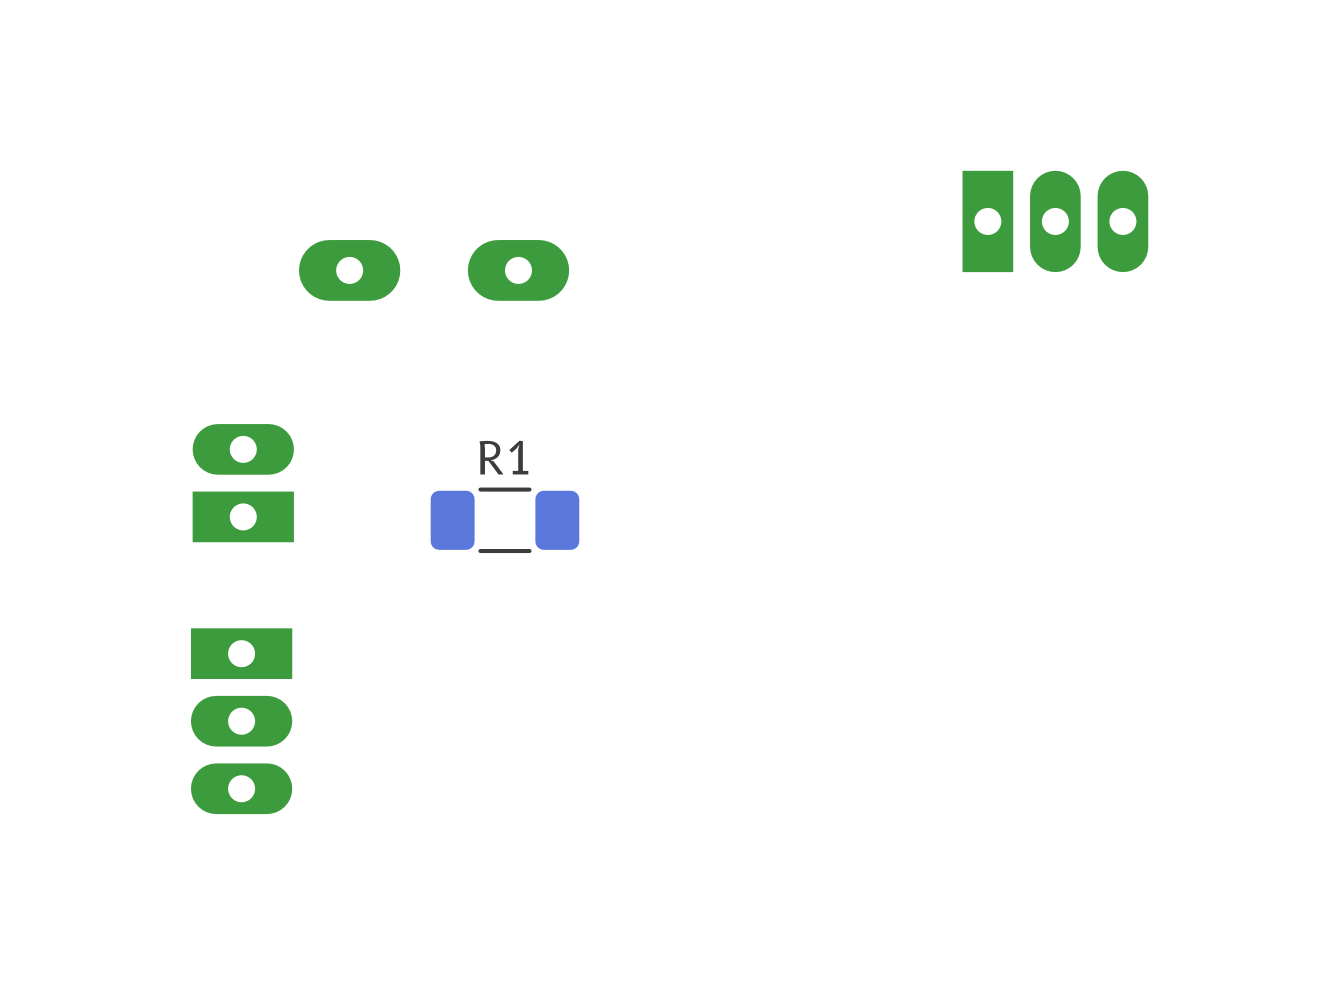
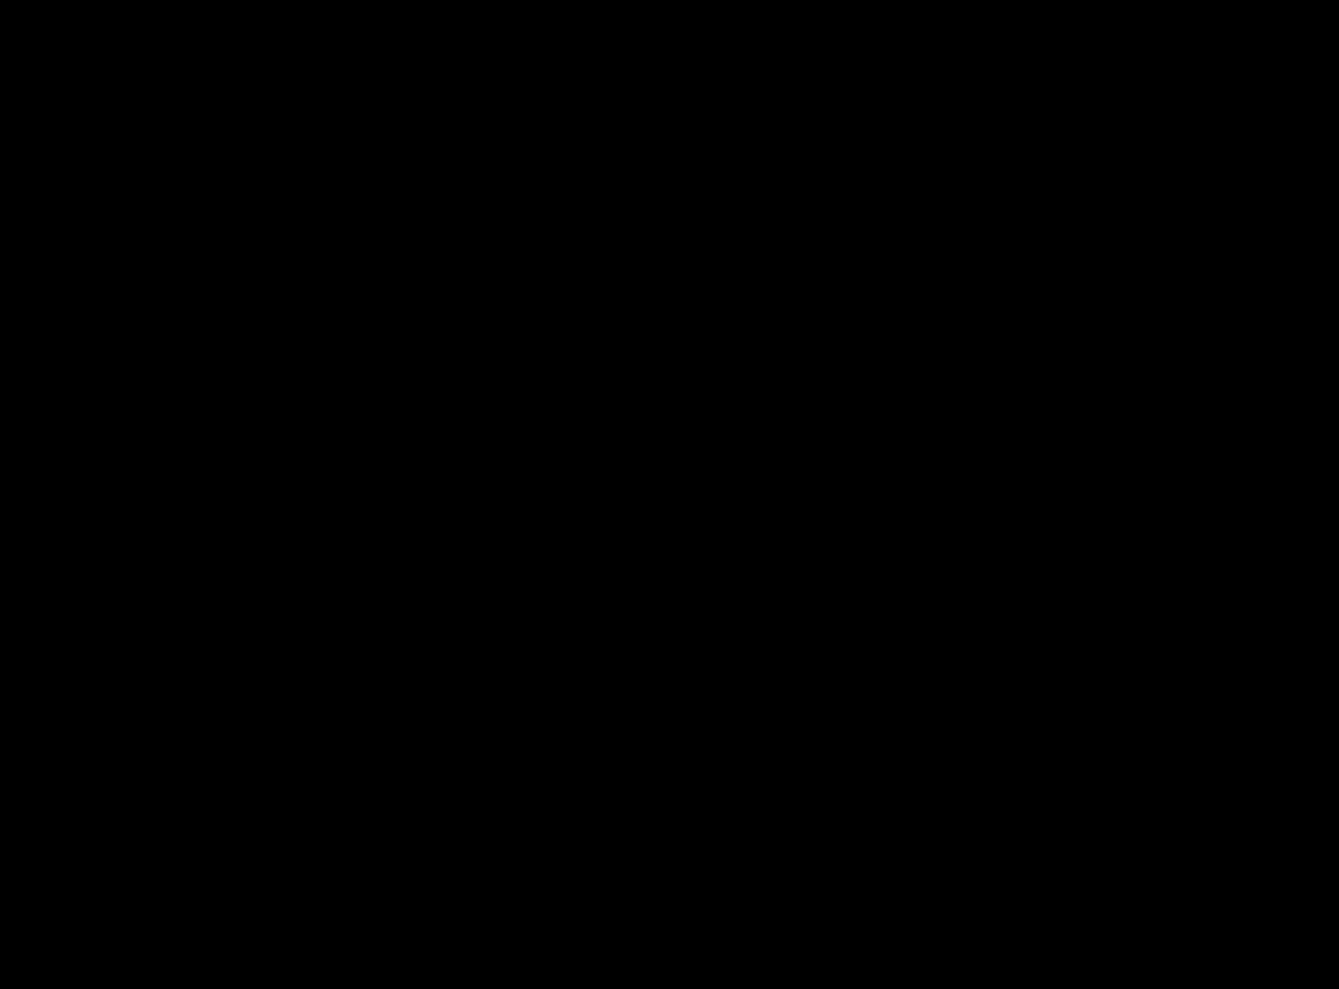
part: (1055, 221) -> none
part: (434, 270) -> none
part: (243, 483) -> none
R1: (504, 520) -> none
part: (241, 721) -> none

